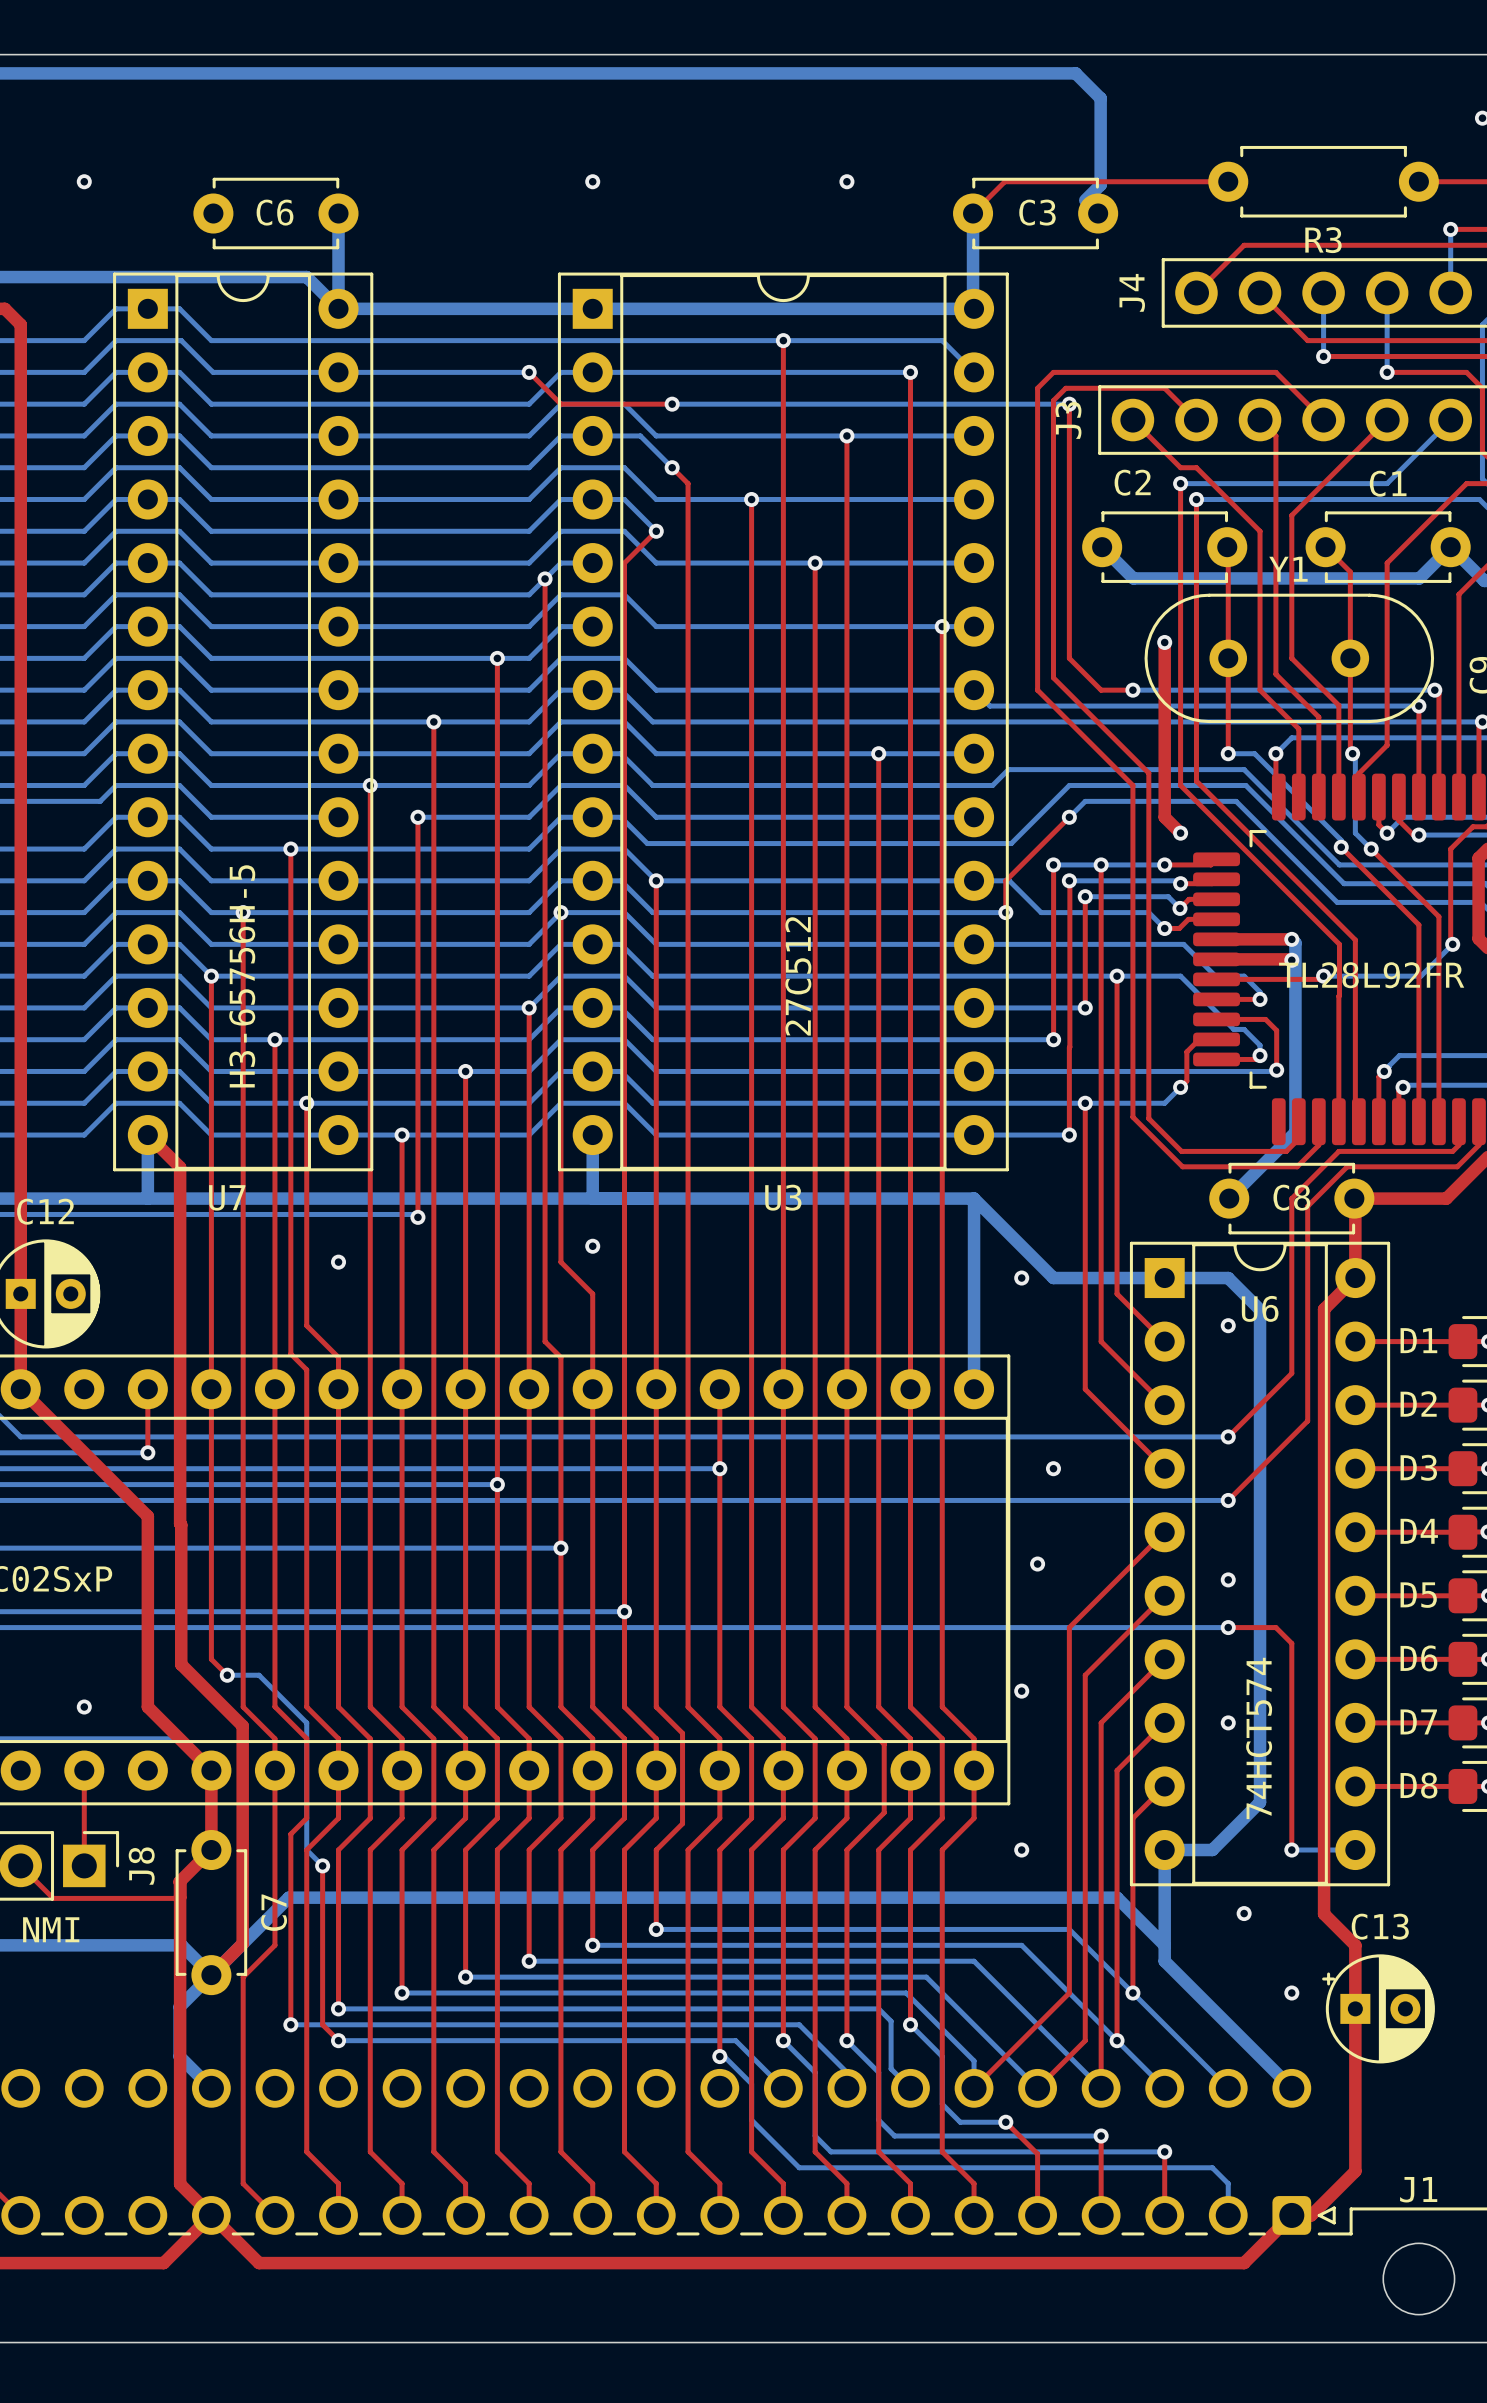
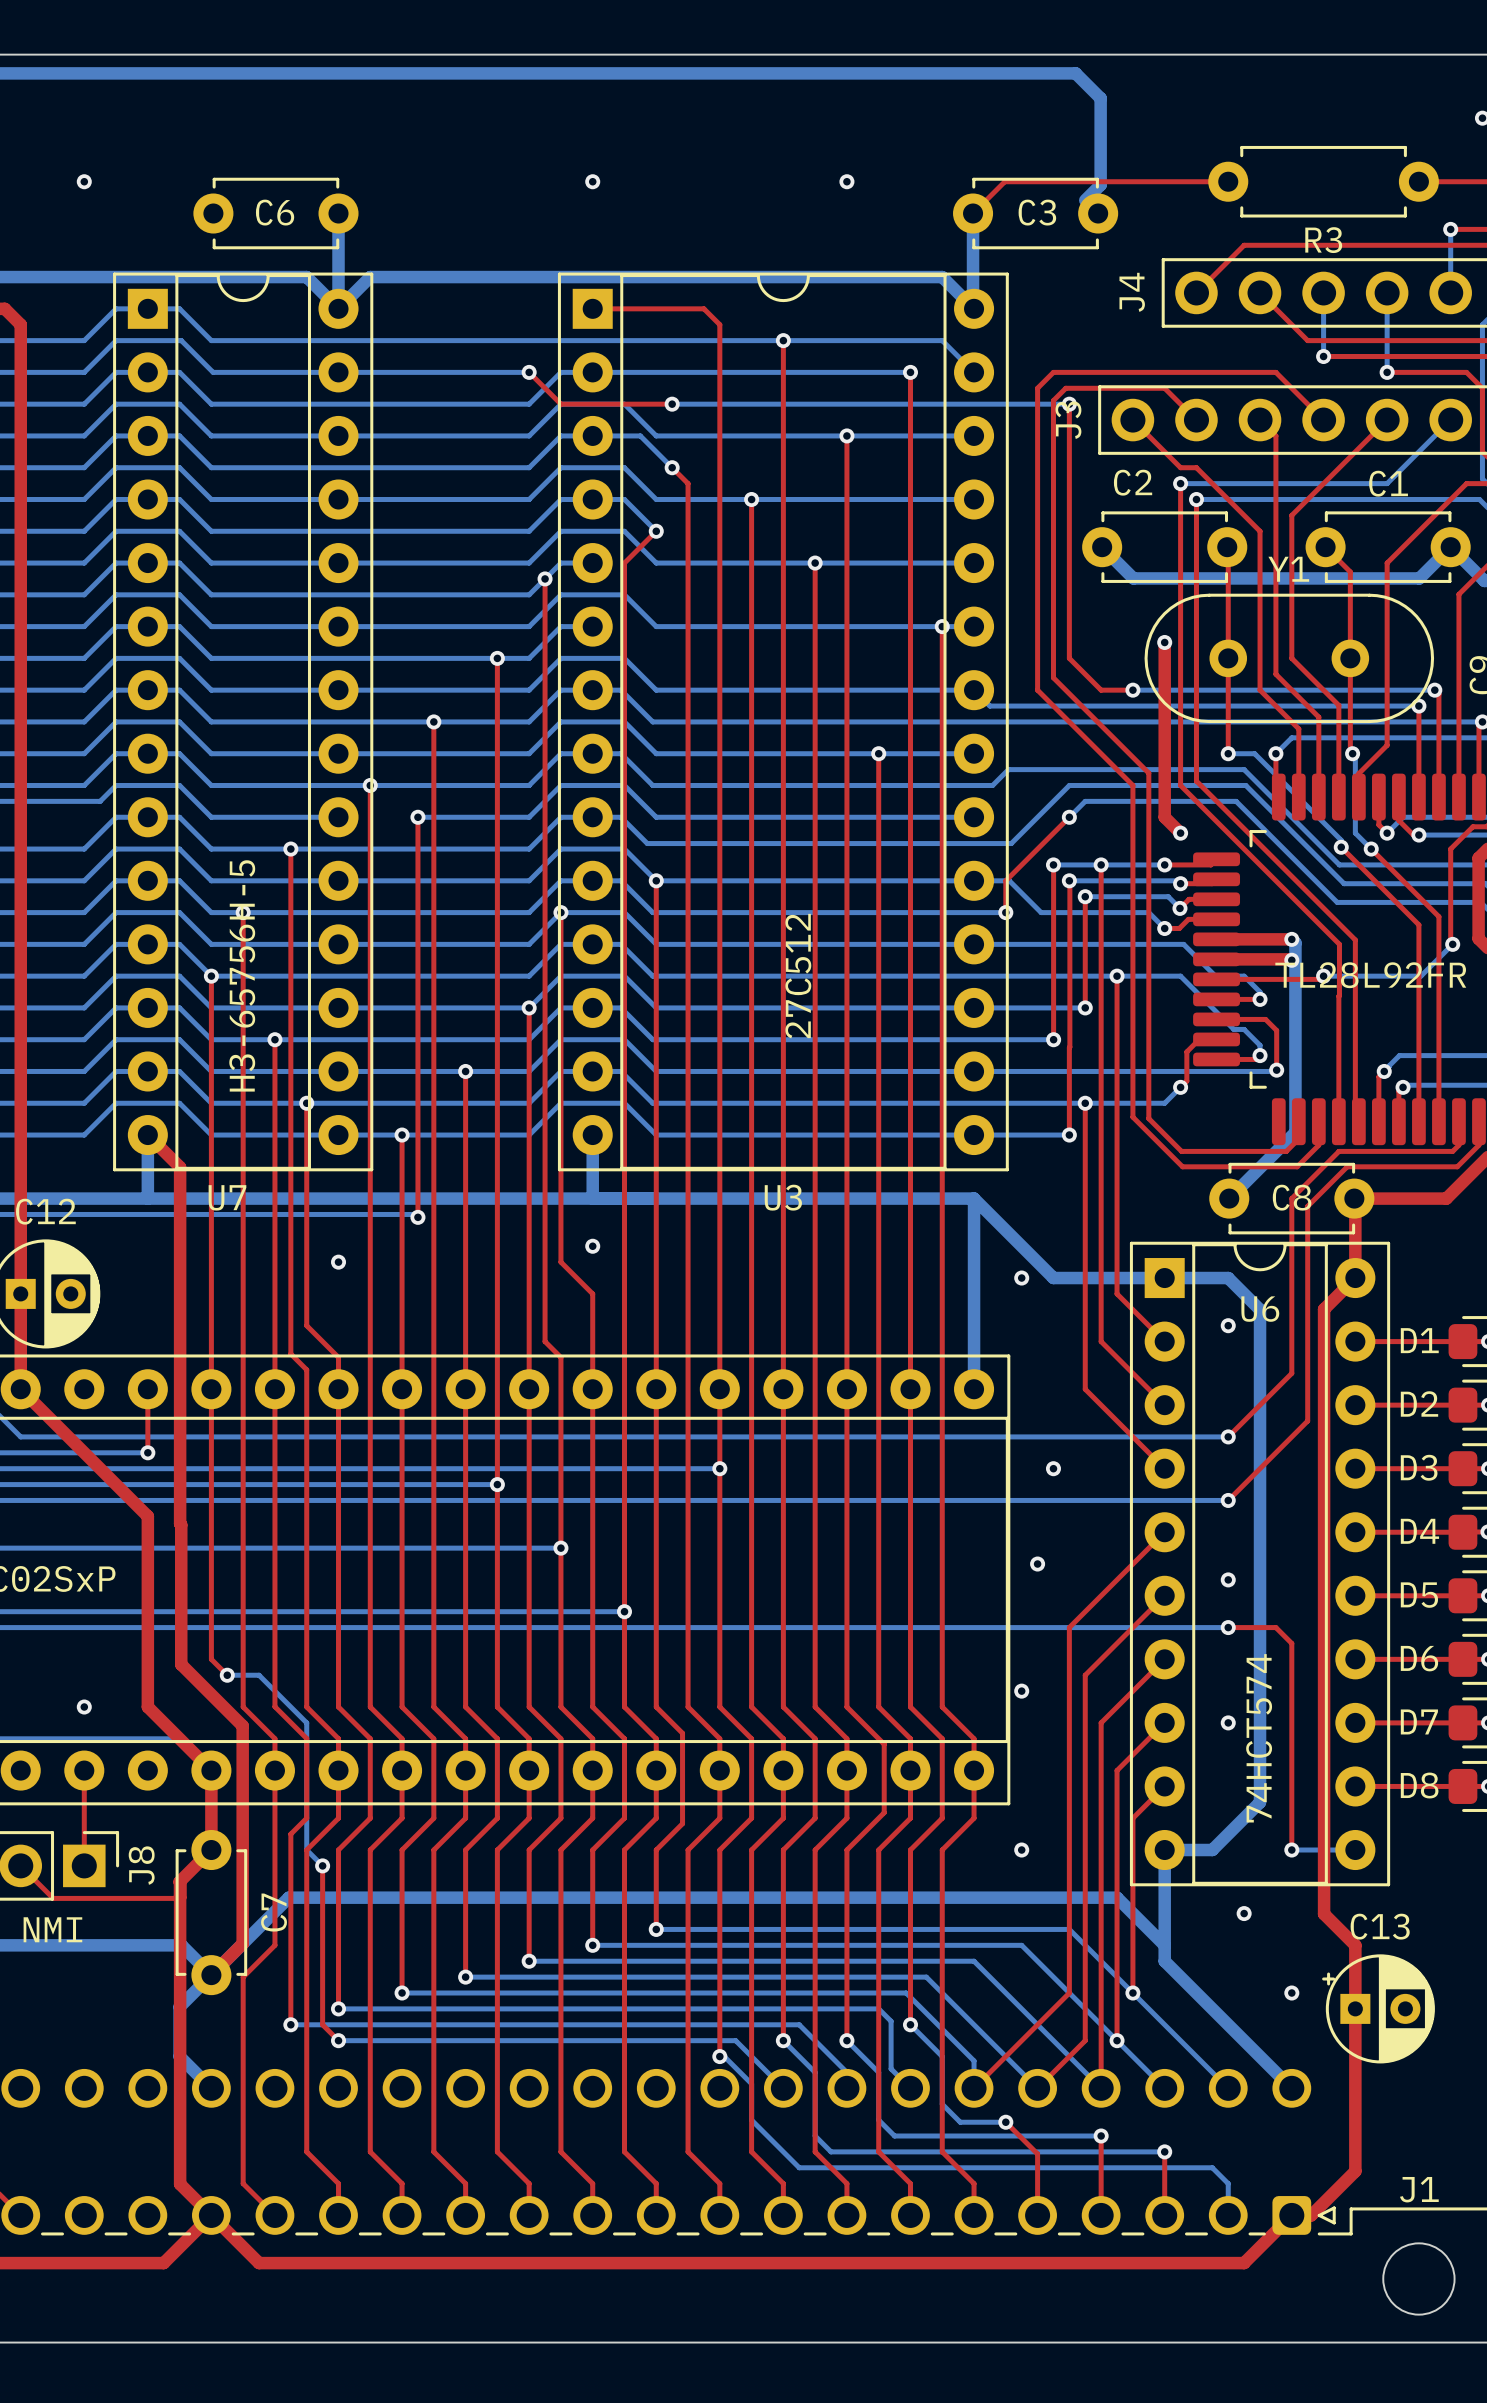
bottom track: (338, 308) (974, 308) -> (338, 308) (370, 277) (942, 277) (973, 307)
top track: none -> (592, 308) (703, 308) (719, 324) (719, 1389)

